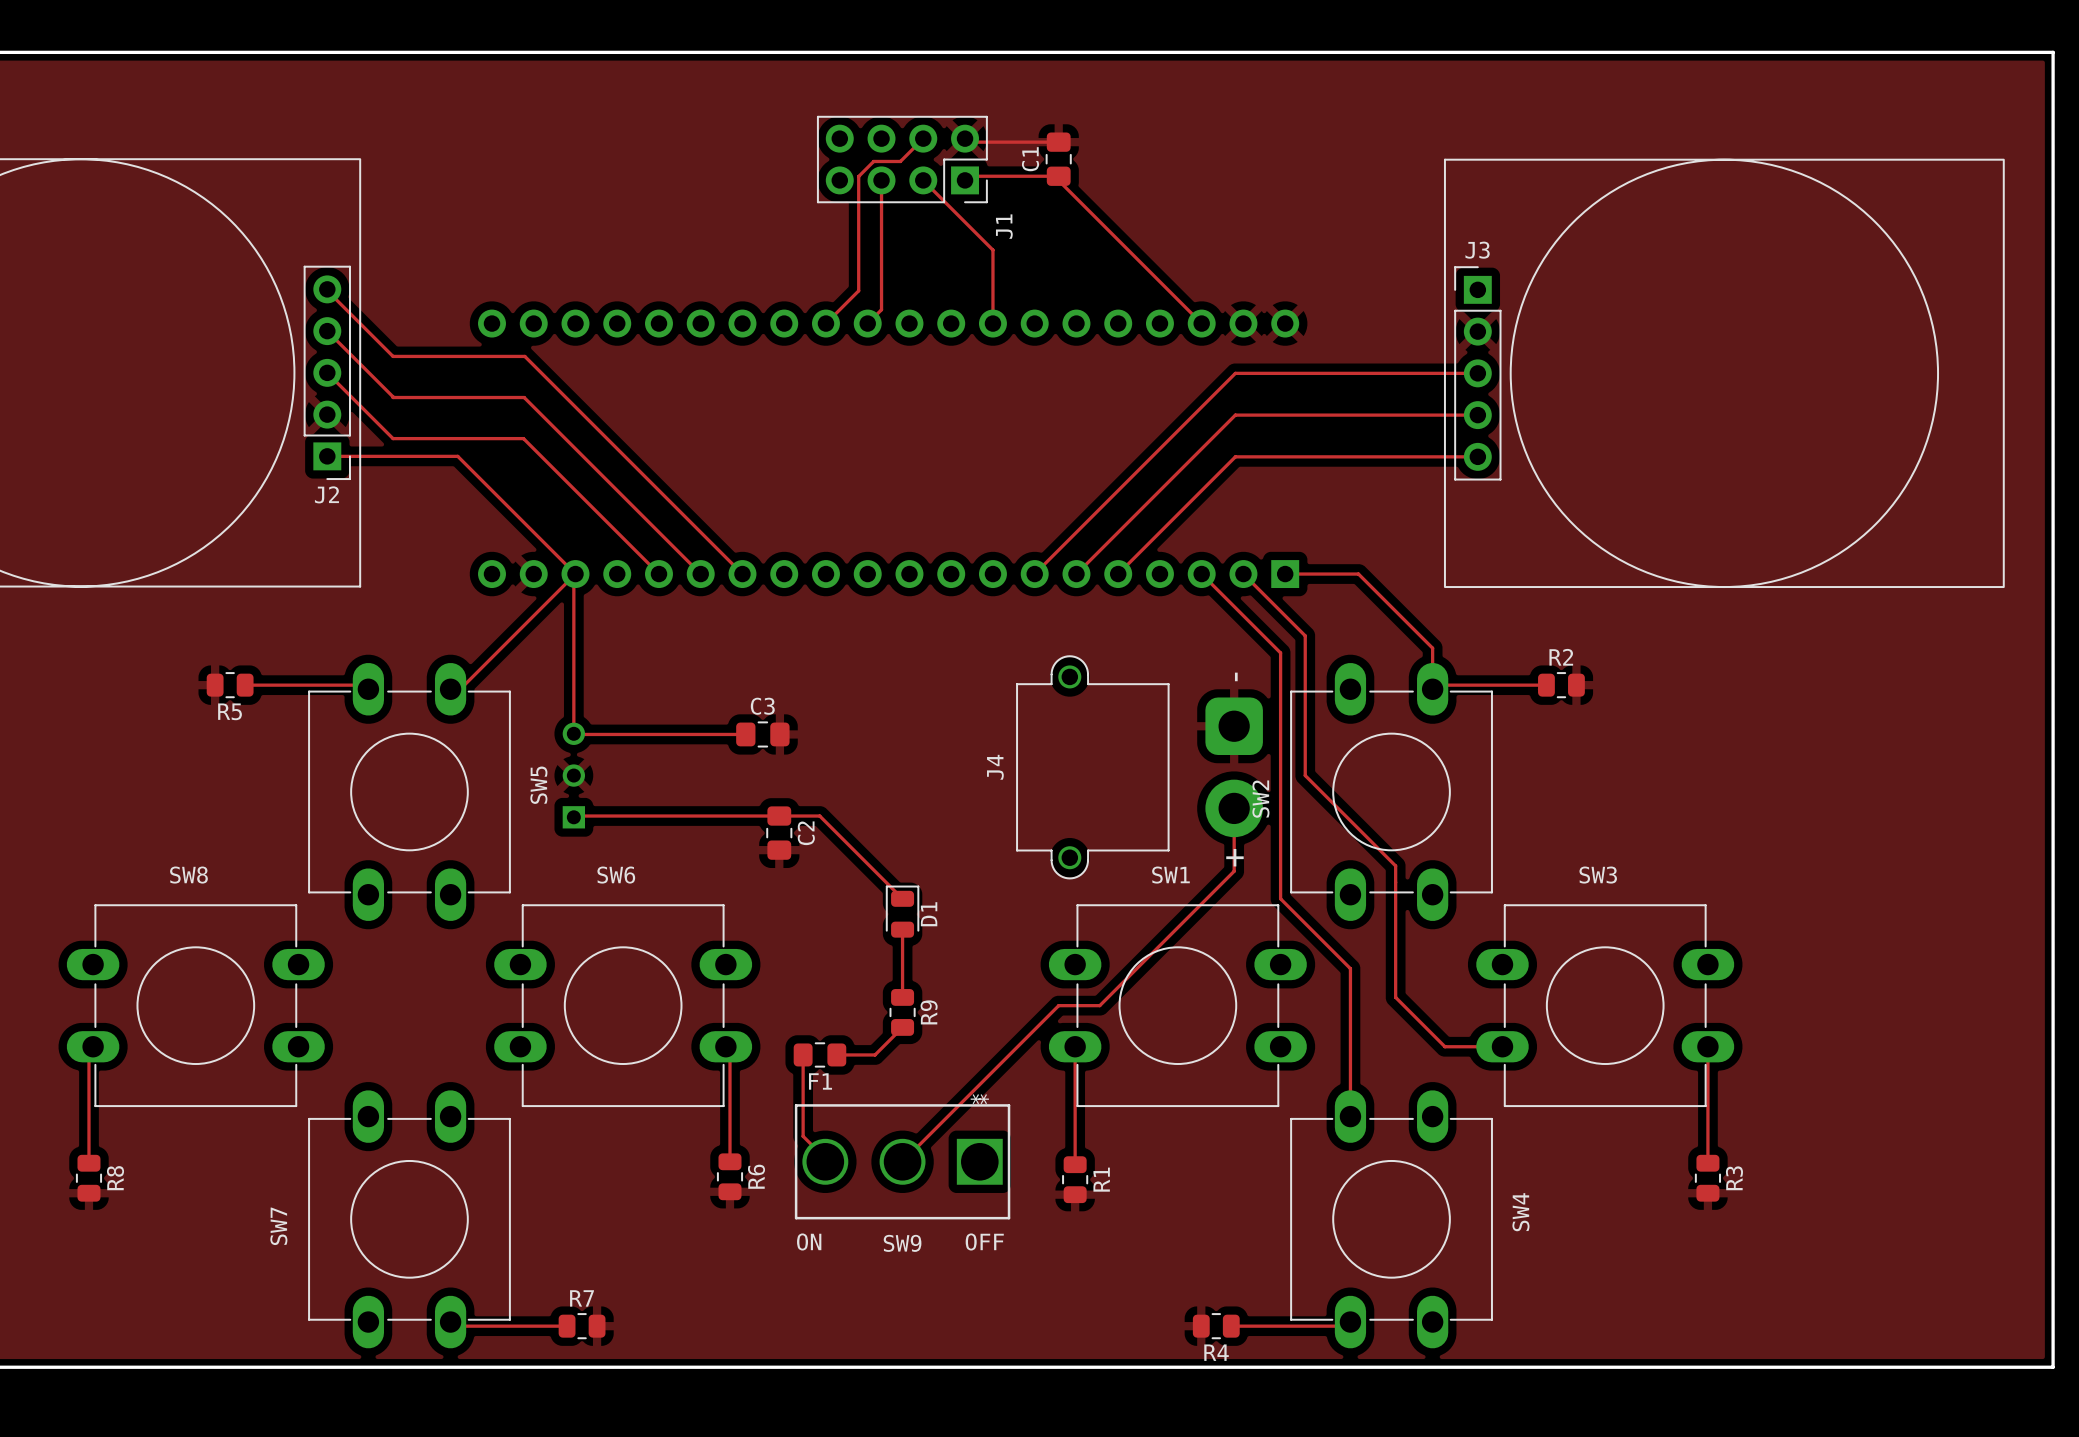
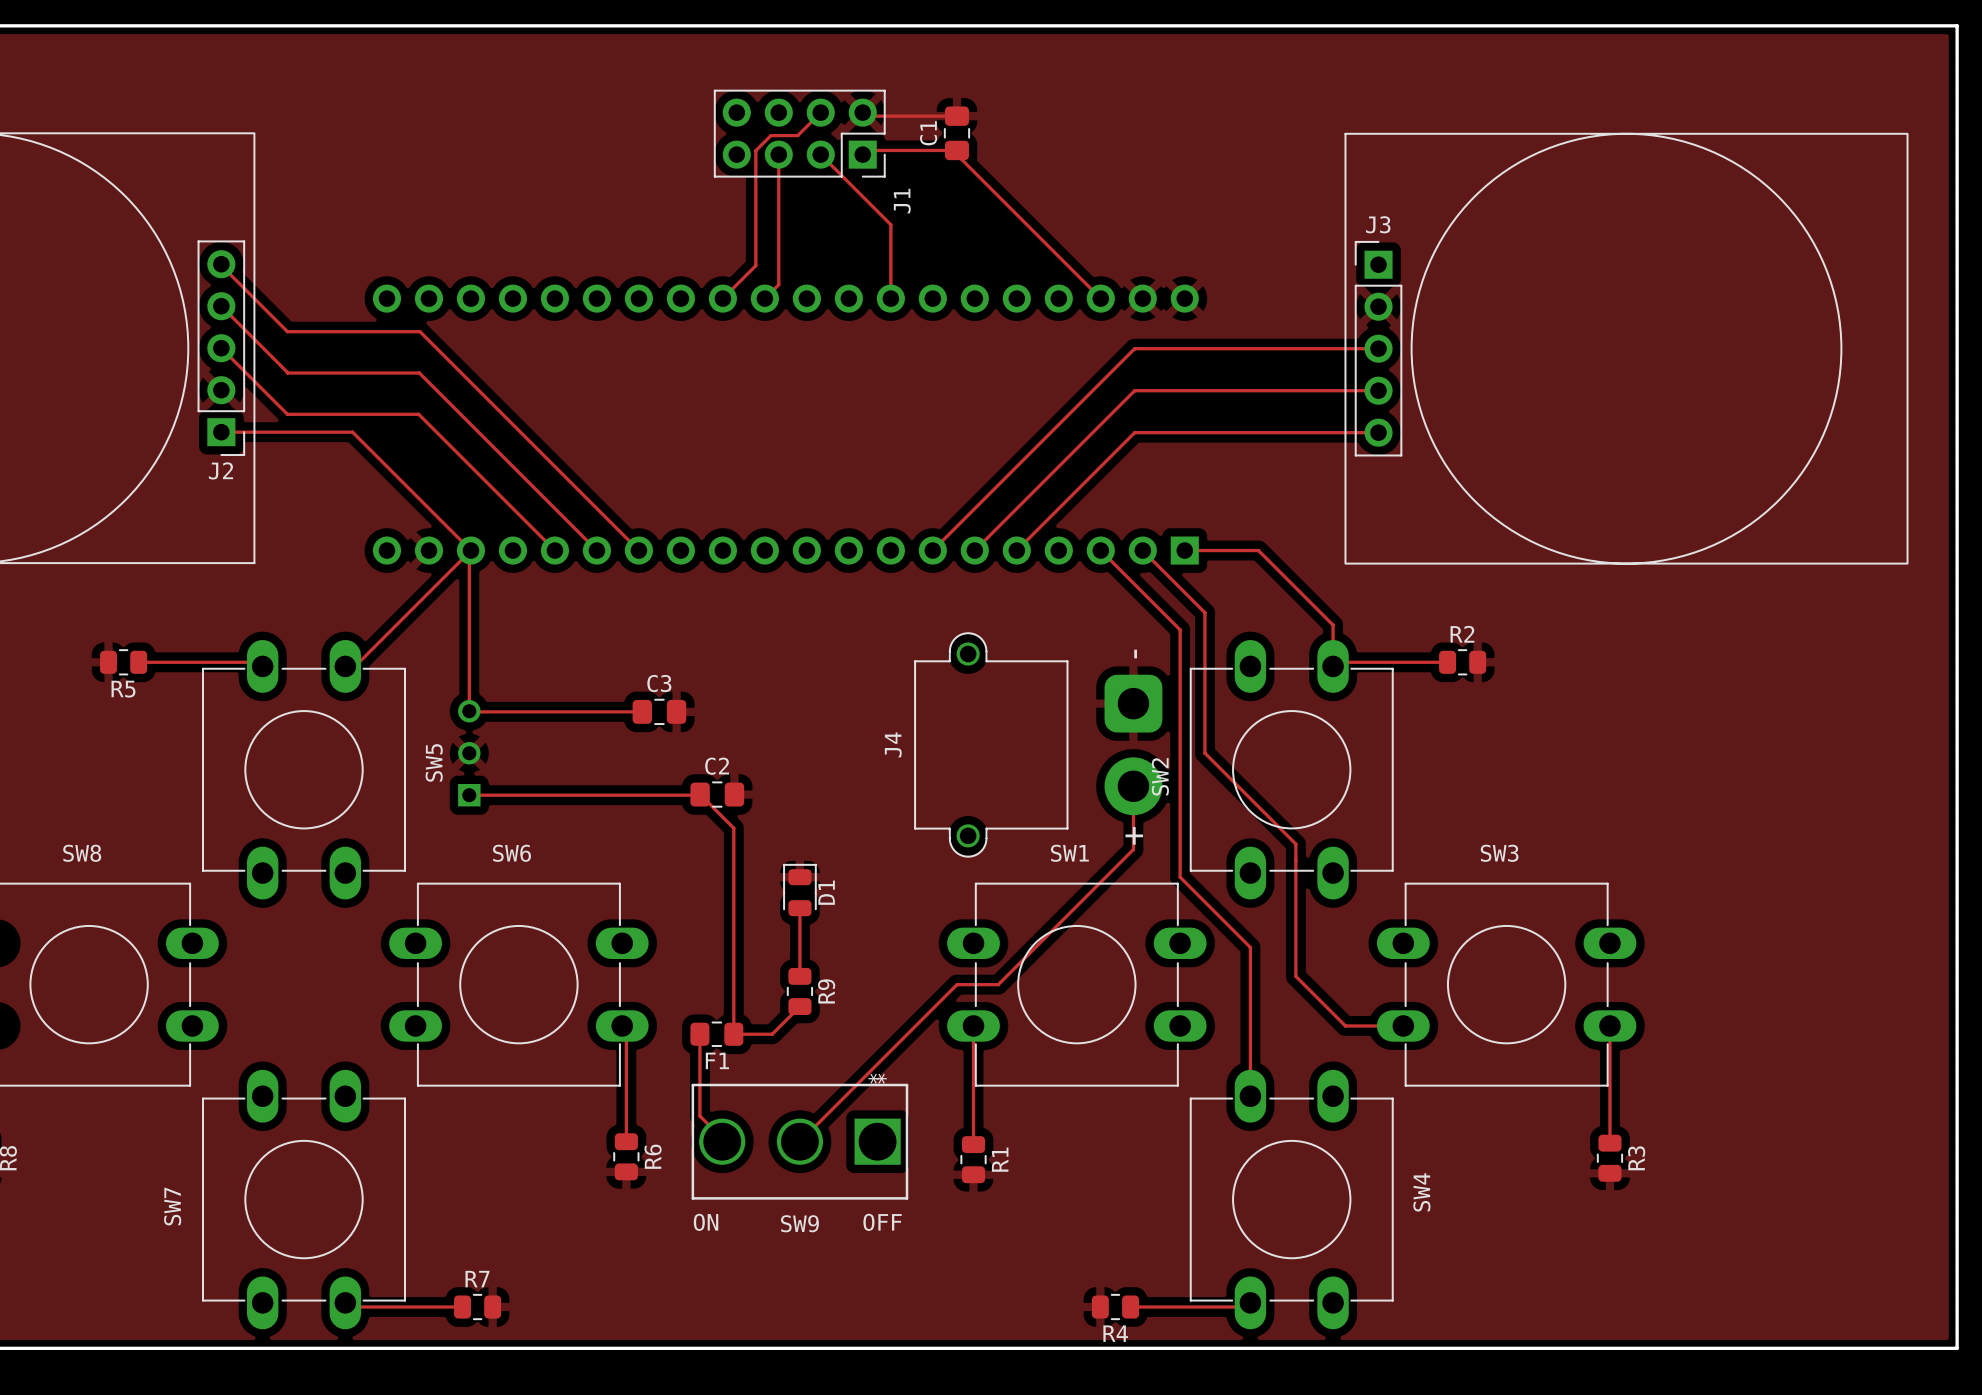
track: (575, 816) (819, 816) (902, 898) -> none
track: none -> (469, 795) (700, 794) (733, 828) (733, 1034)
C2 rotation: 0° (779, 833) -> 90° clockwise (717, 794)
C2 position: (779, 833) -> (717, 794)
C2 name position: C2 (806, 833) -> C2 (717, 766)

